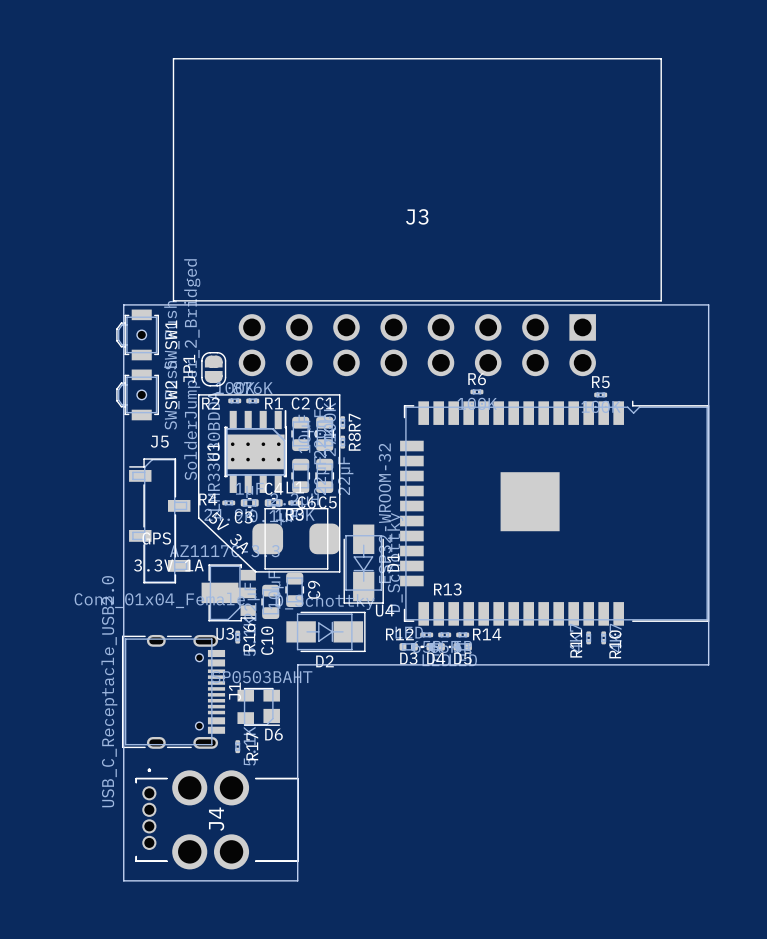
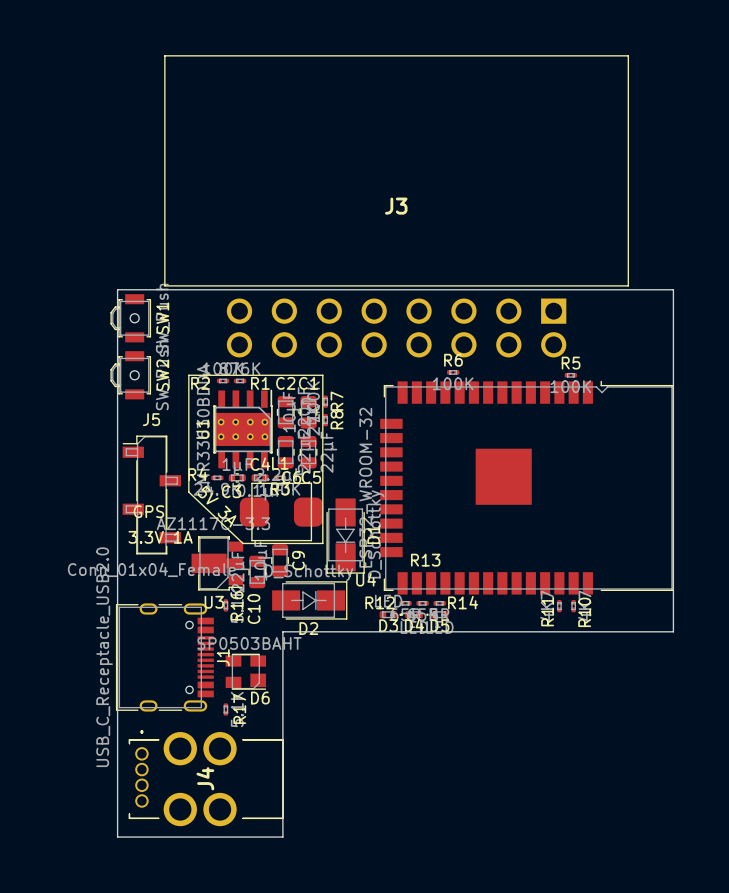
JP1: SolderJumper_2_Bridged (213, 369) -> none

